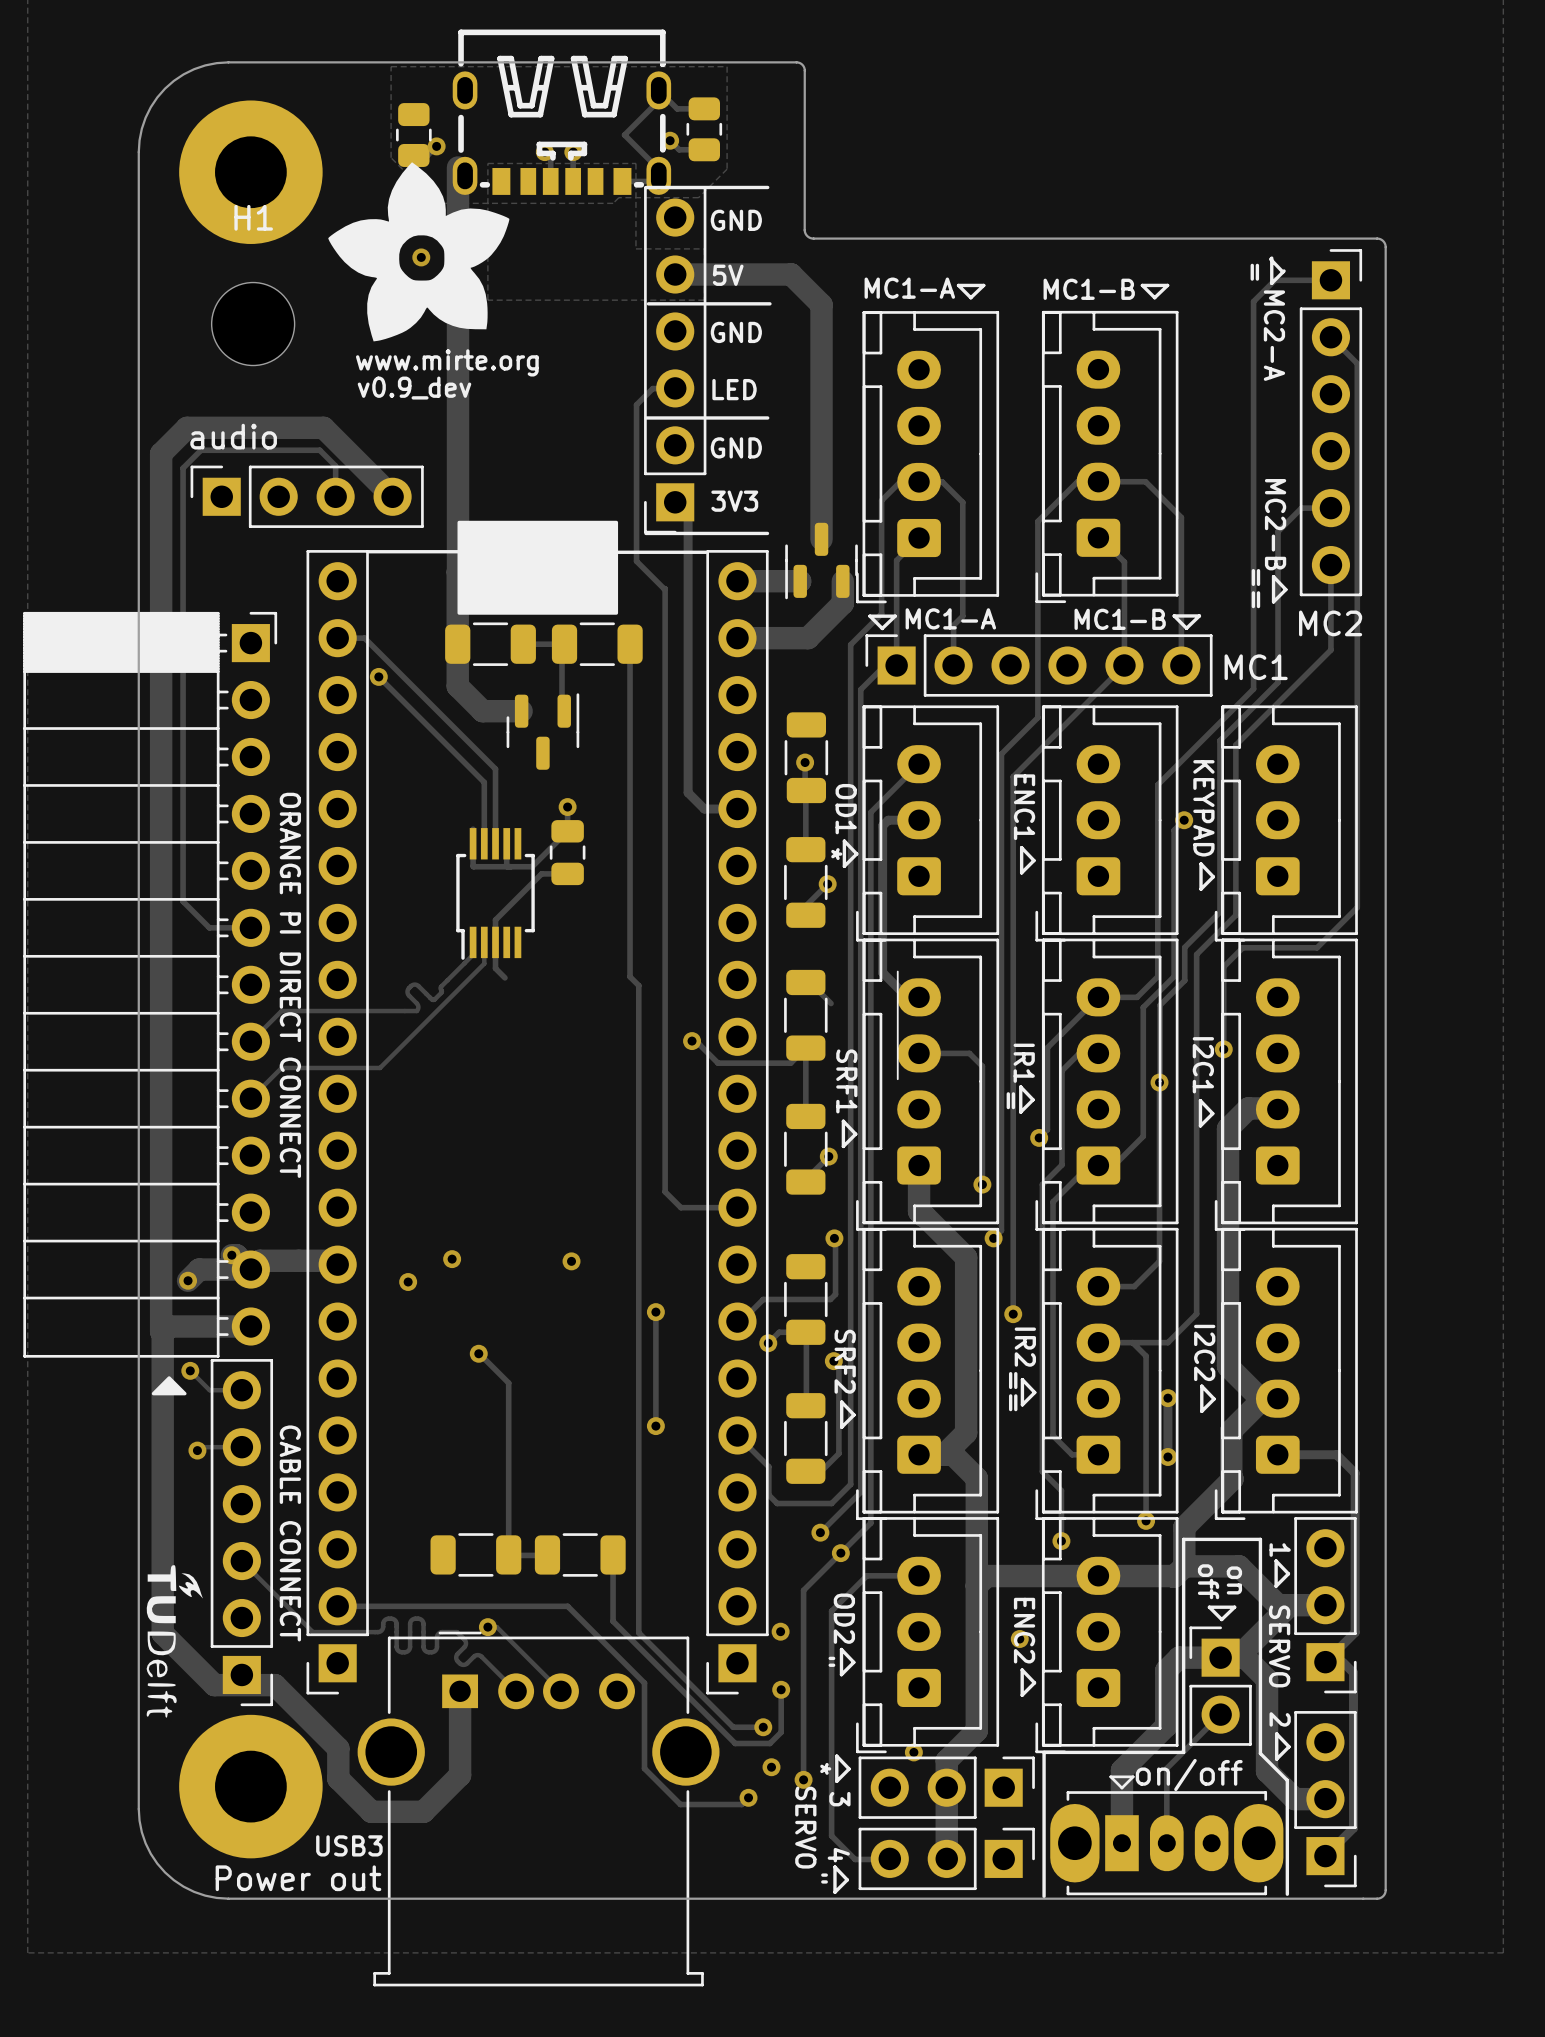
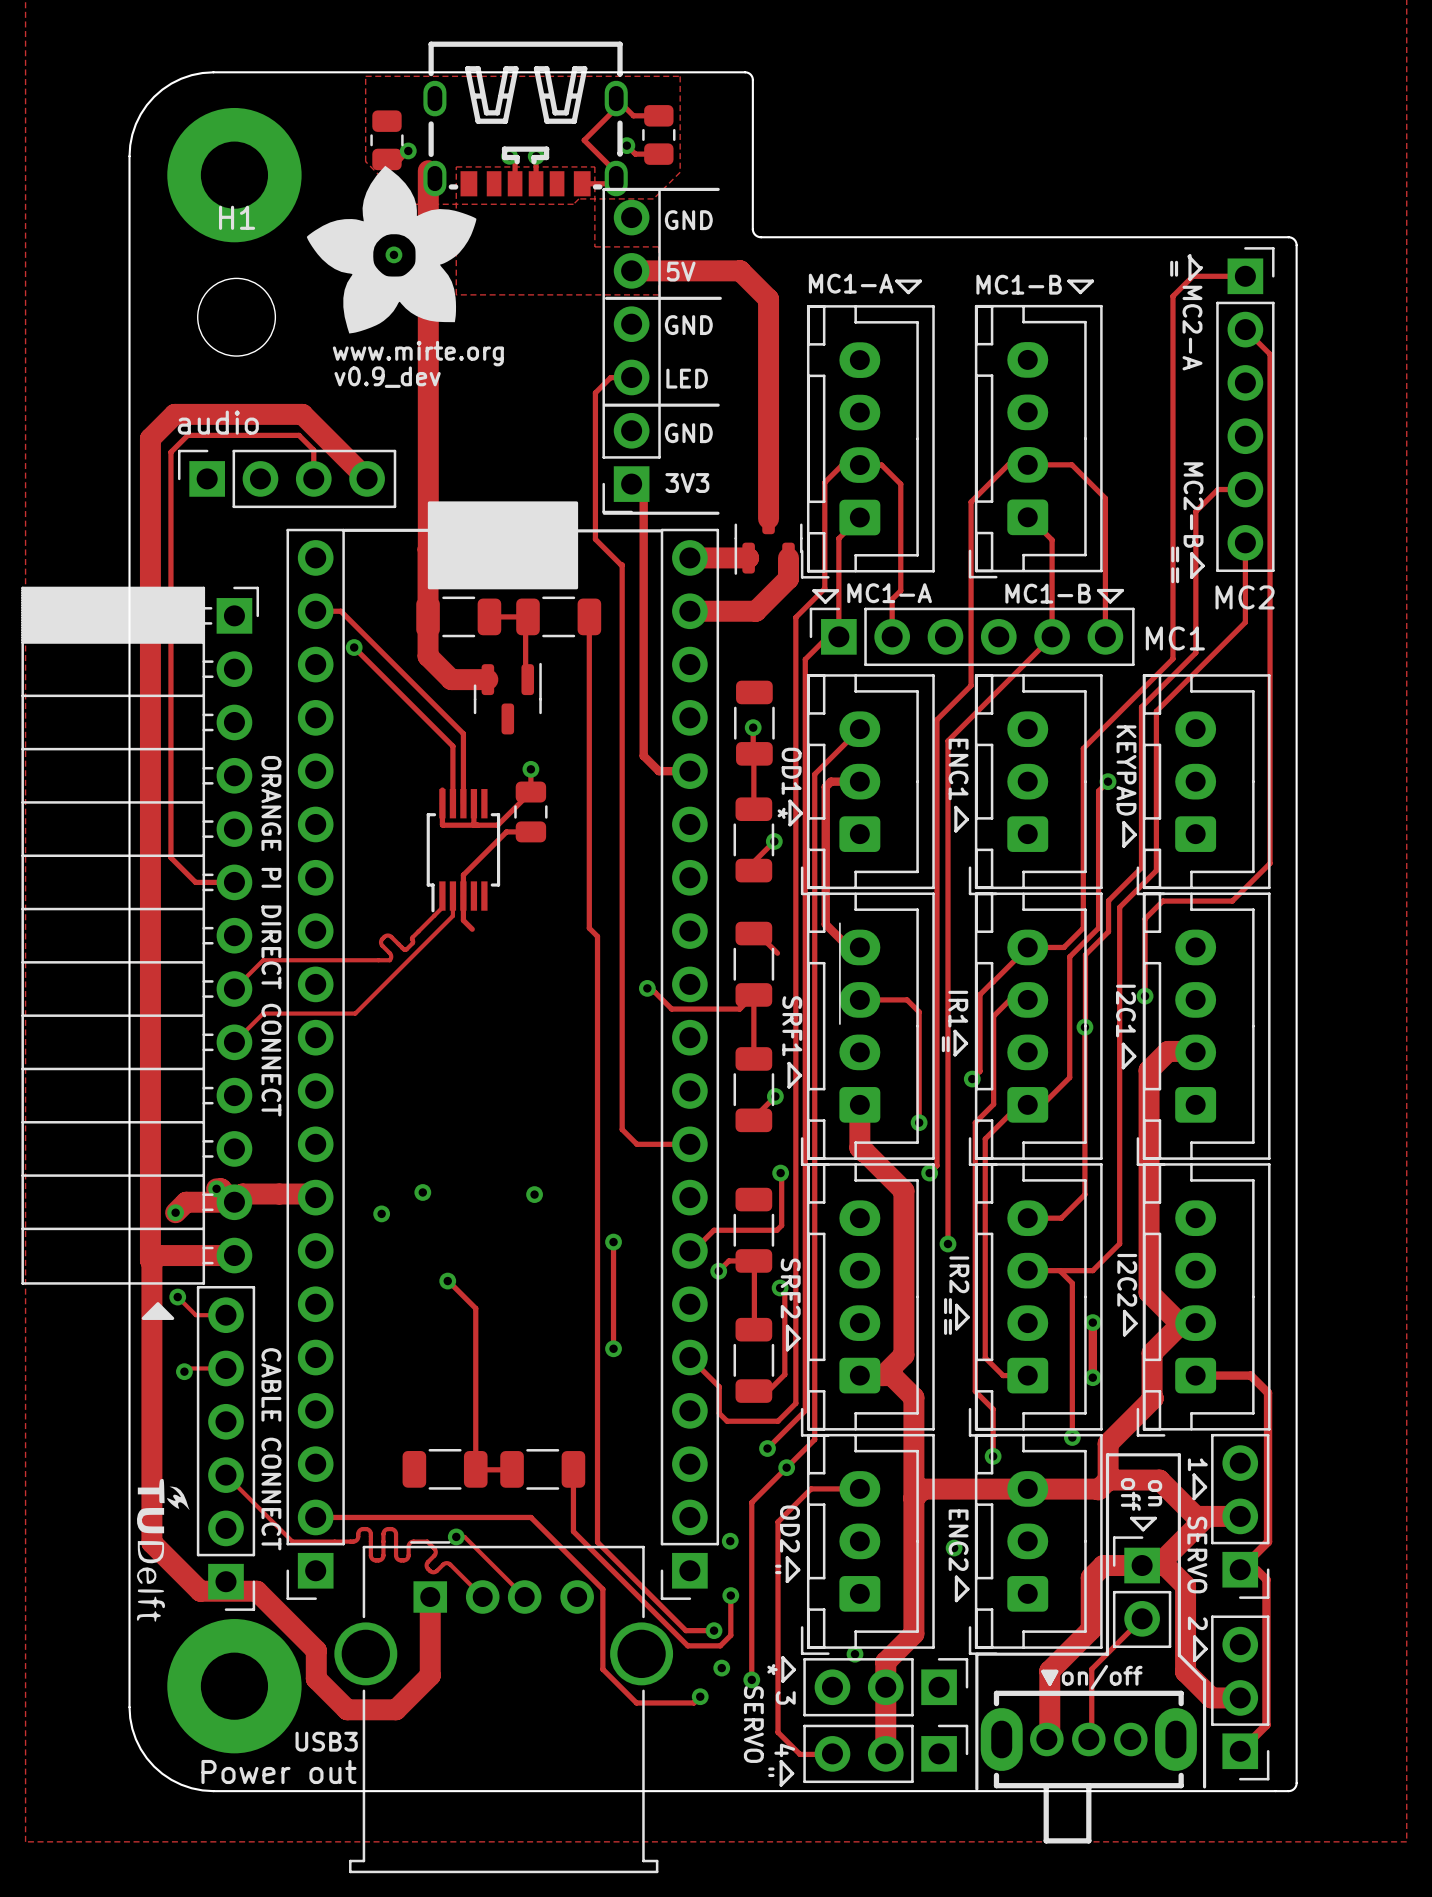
text: none -> ▼on/off (1091, 1677)
part: on/off (1166, 1835) -> none
part: none -> (1088, 1767)

